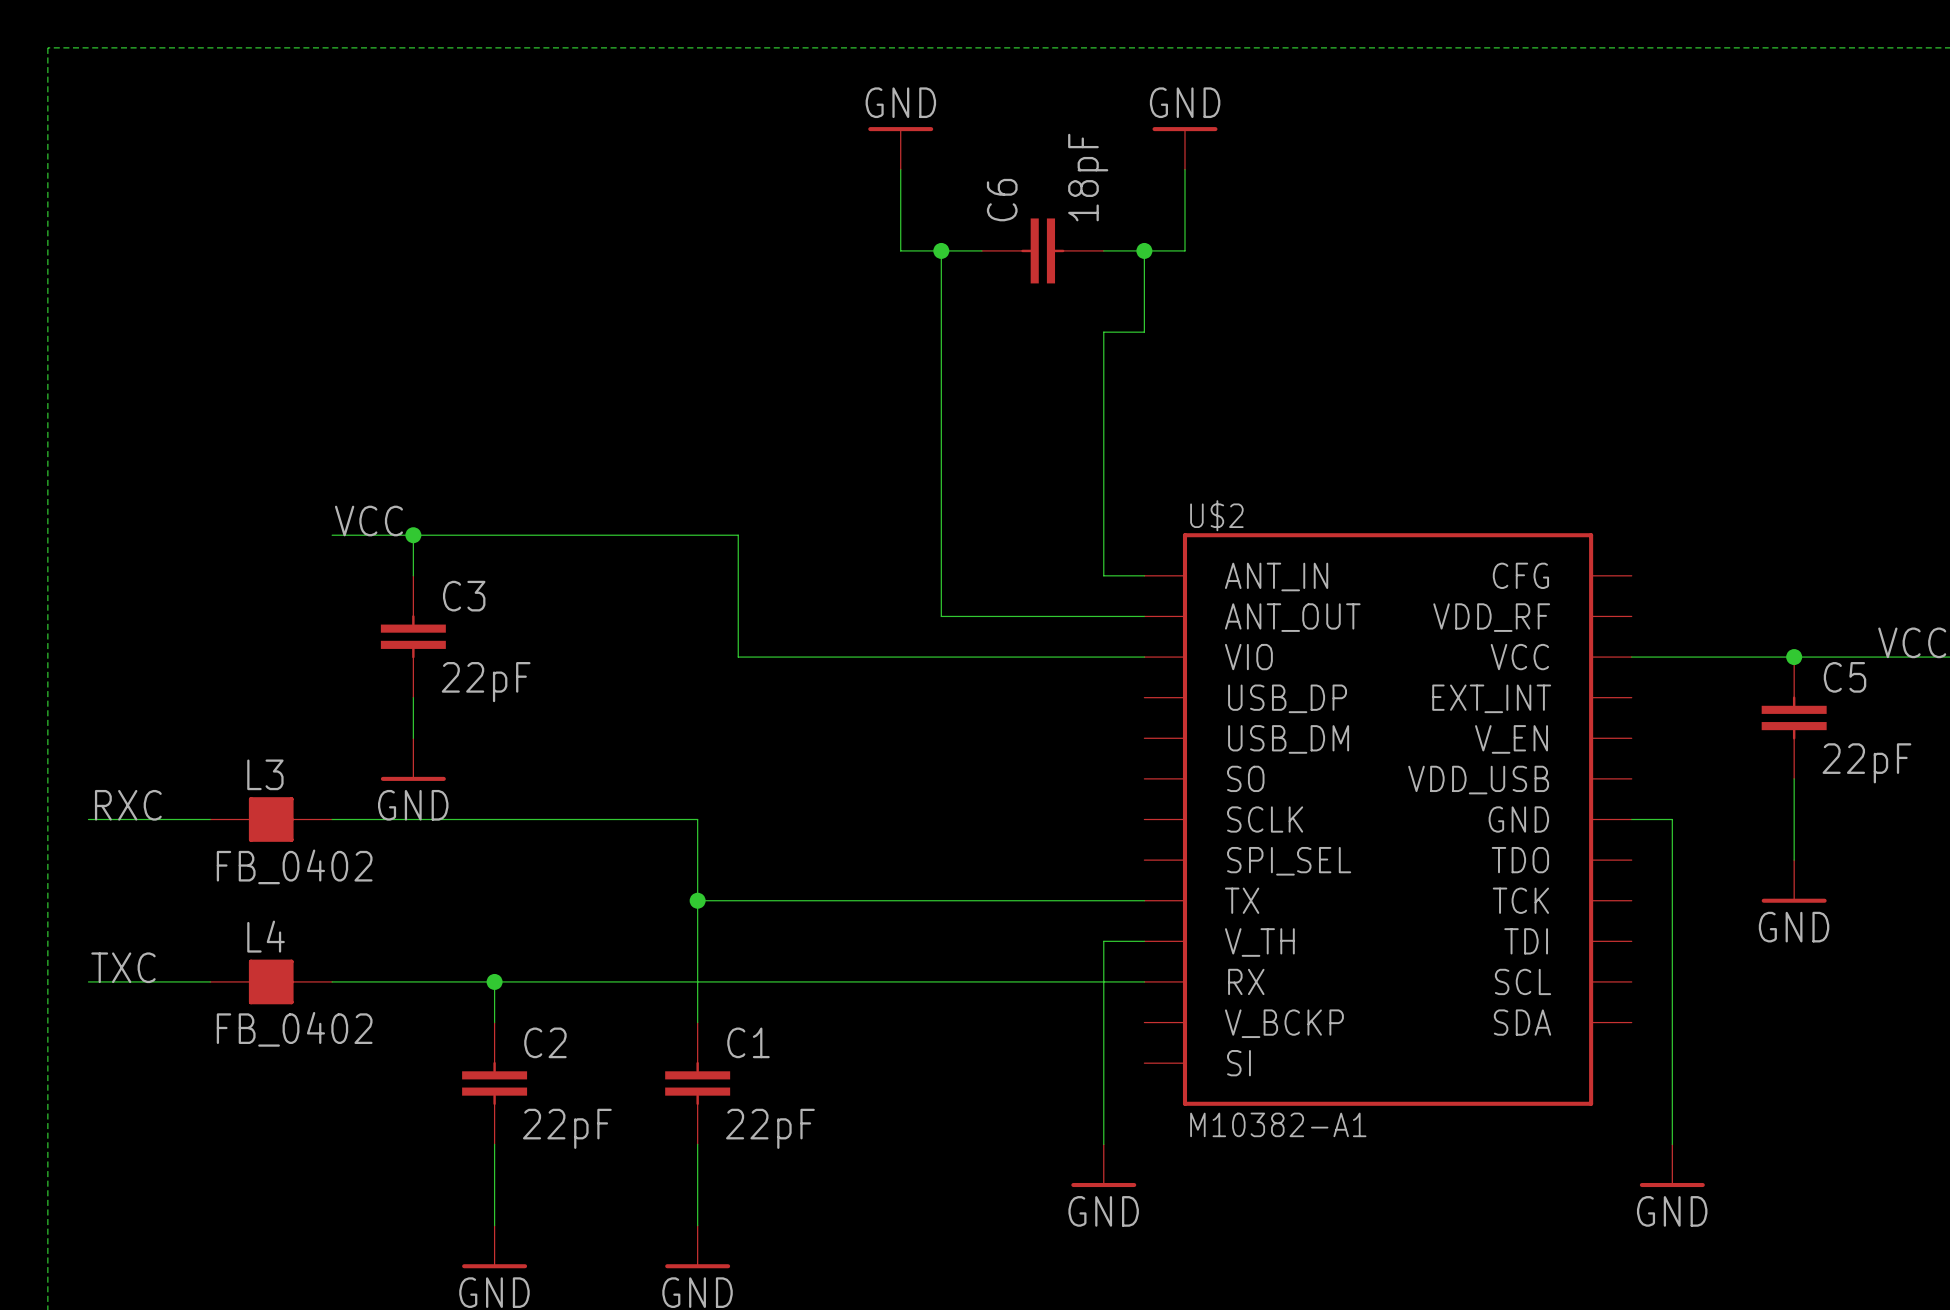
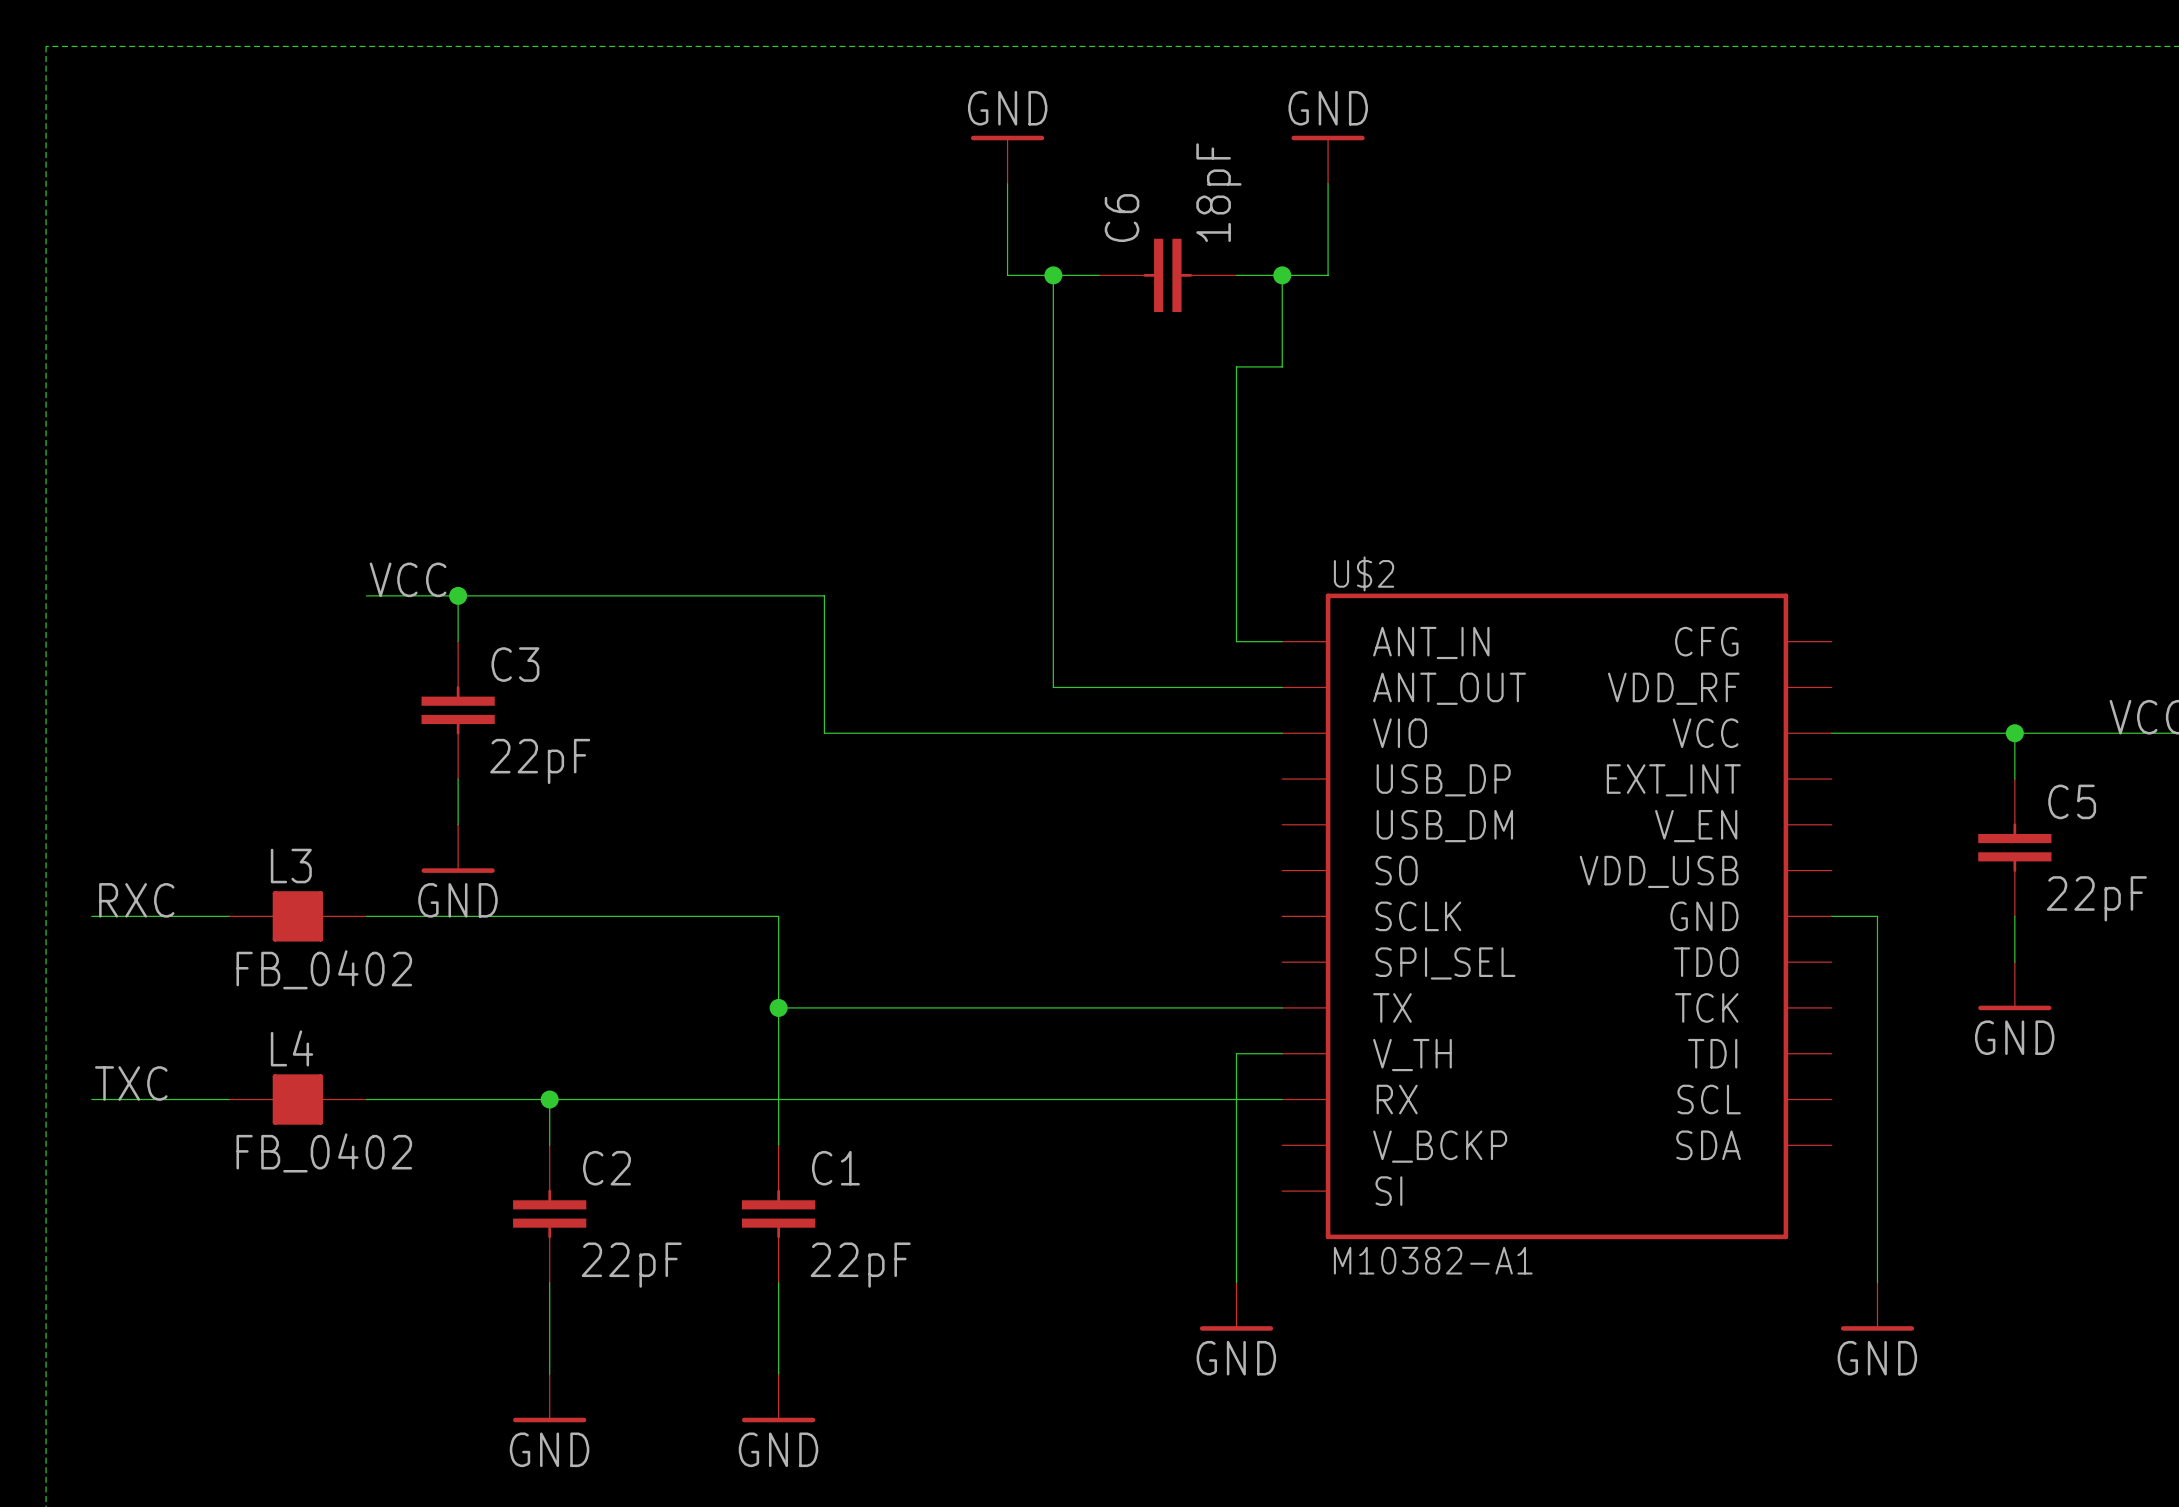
C5 position: (1794, 717) -> (2014, 847)

